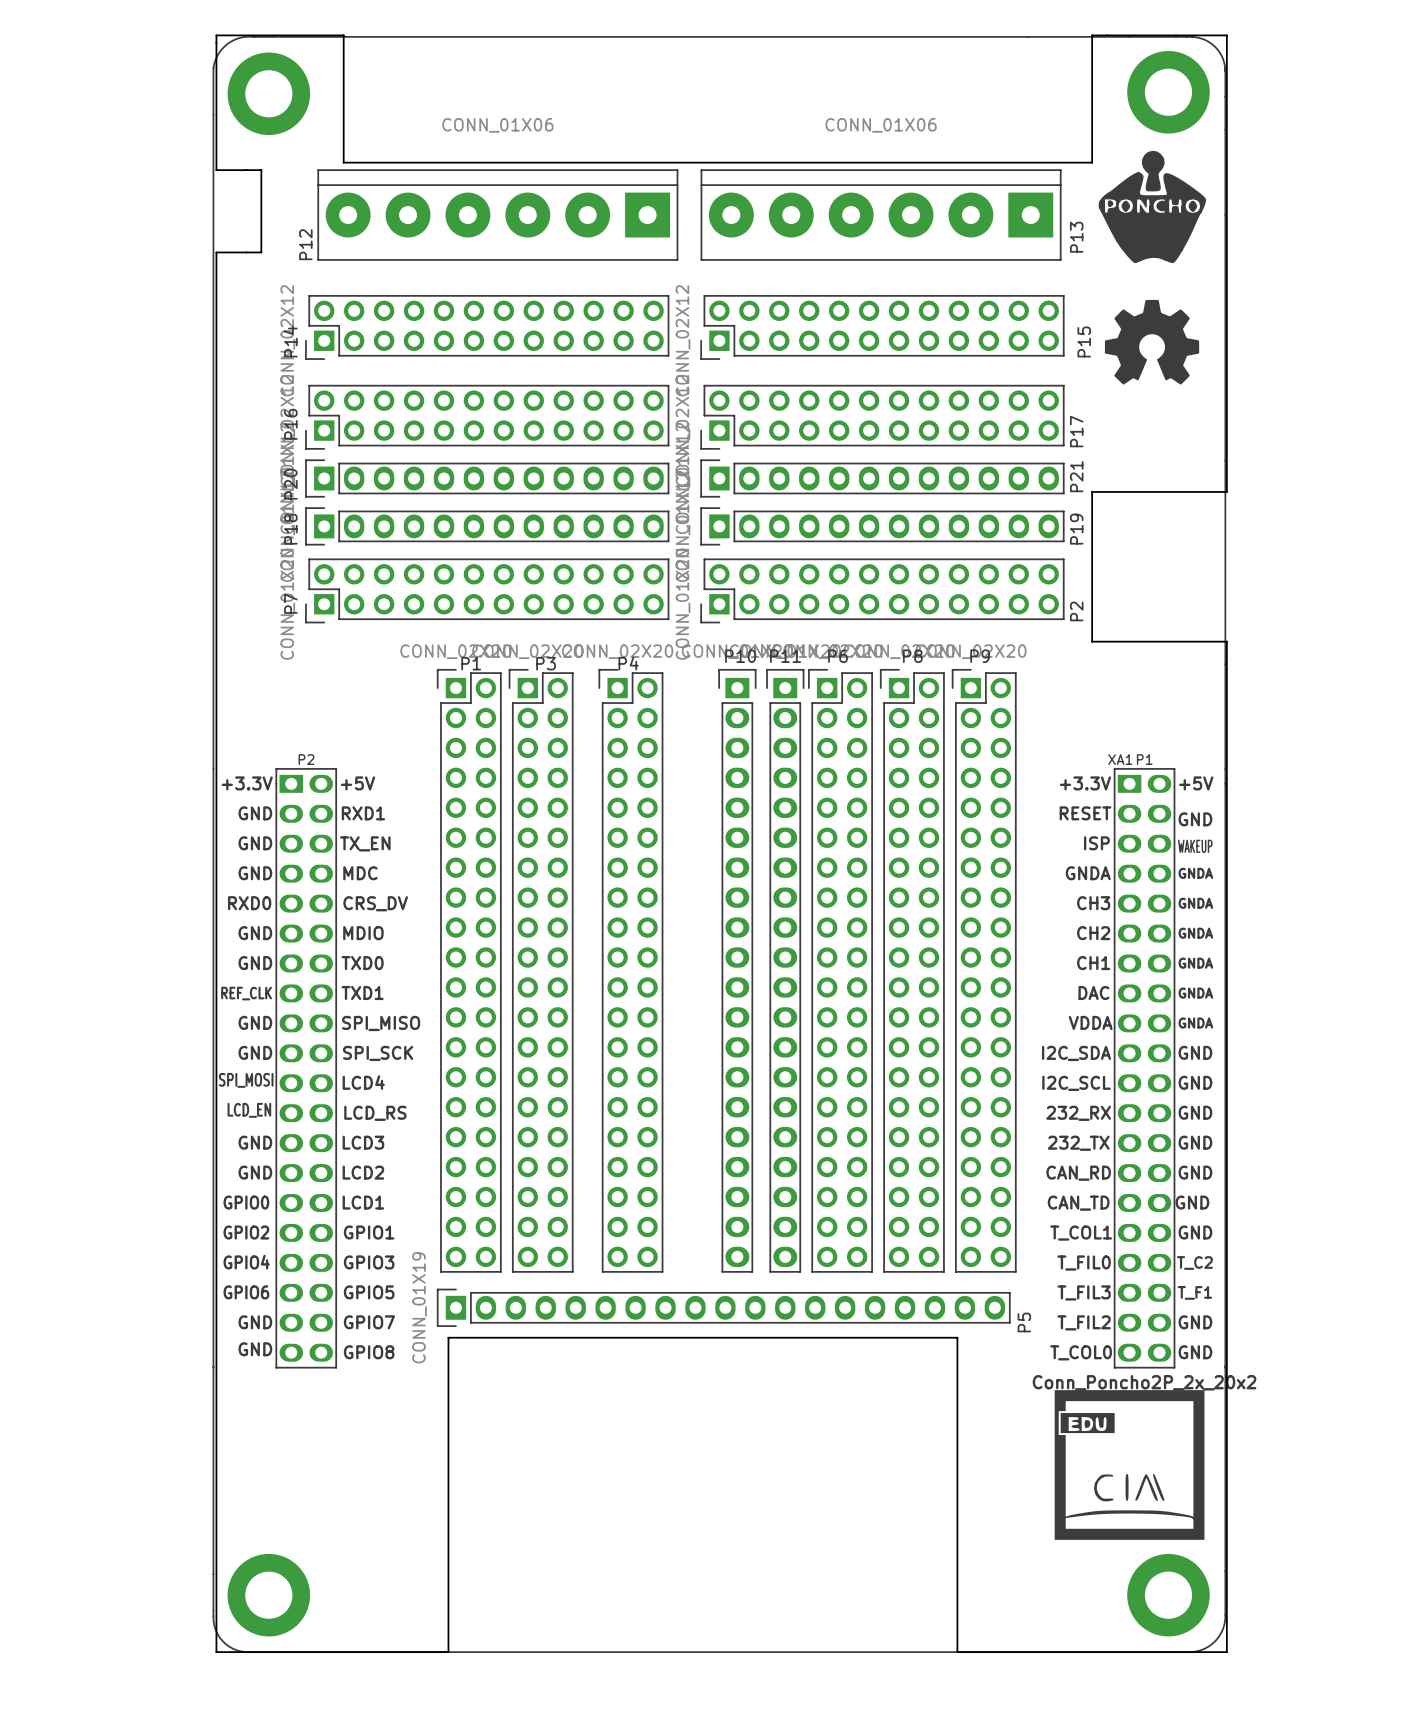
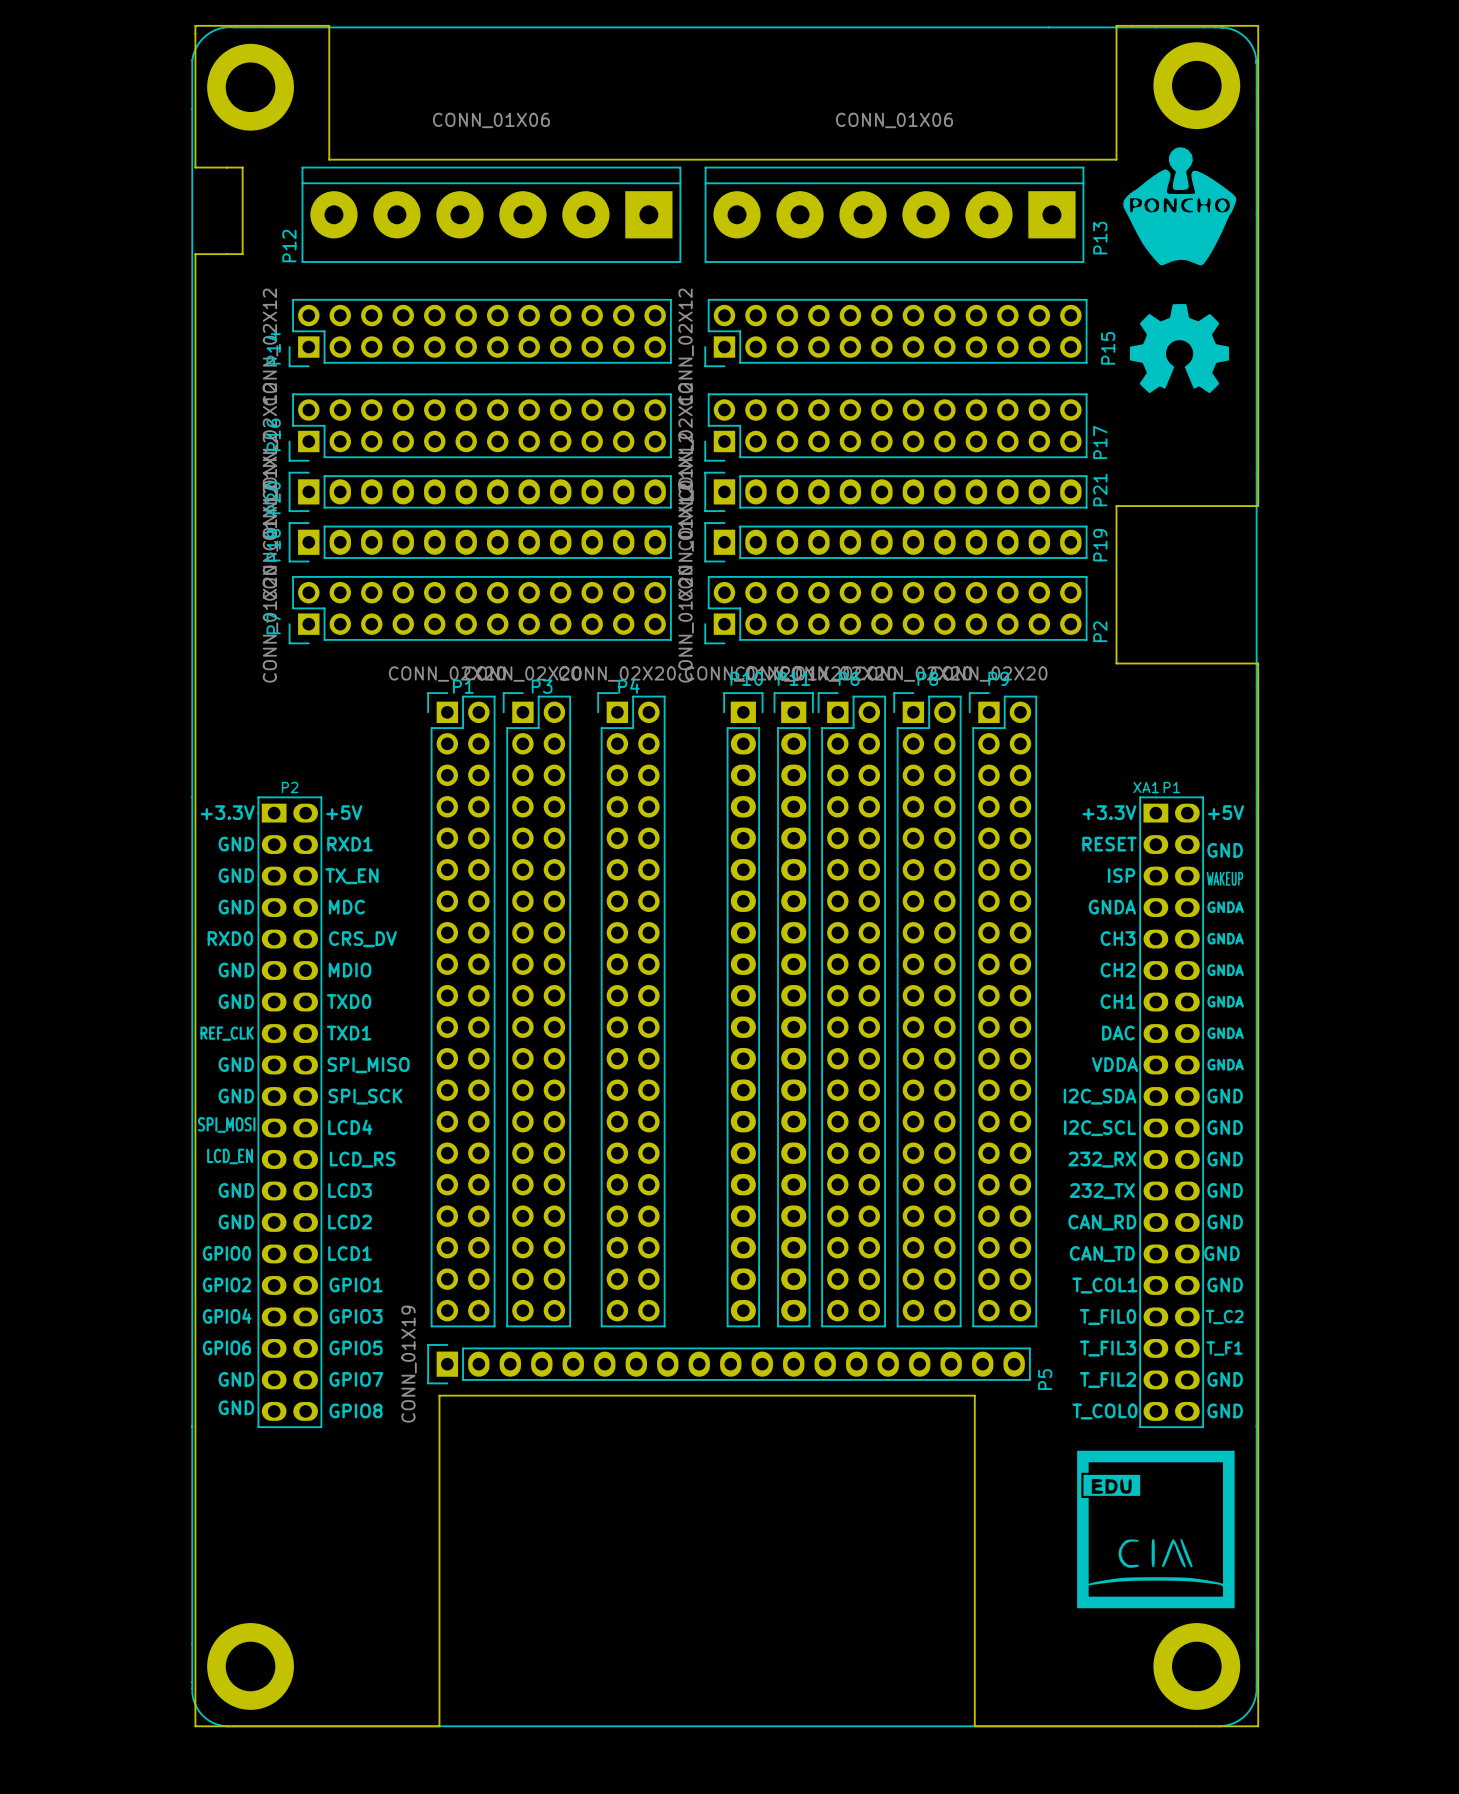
XA1 value: Conn_Poncho2P_2x_20x2 (1144, 1382) -> none

